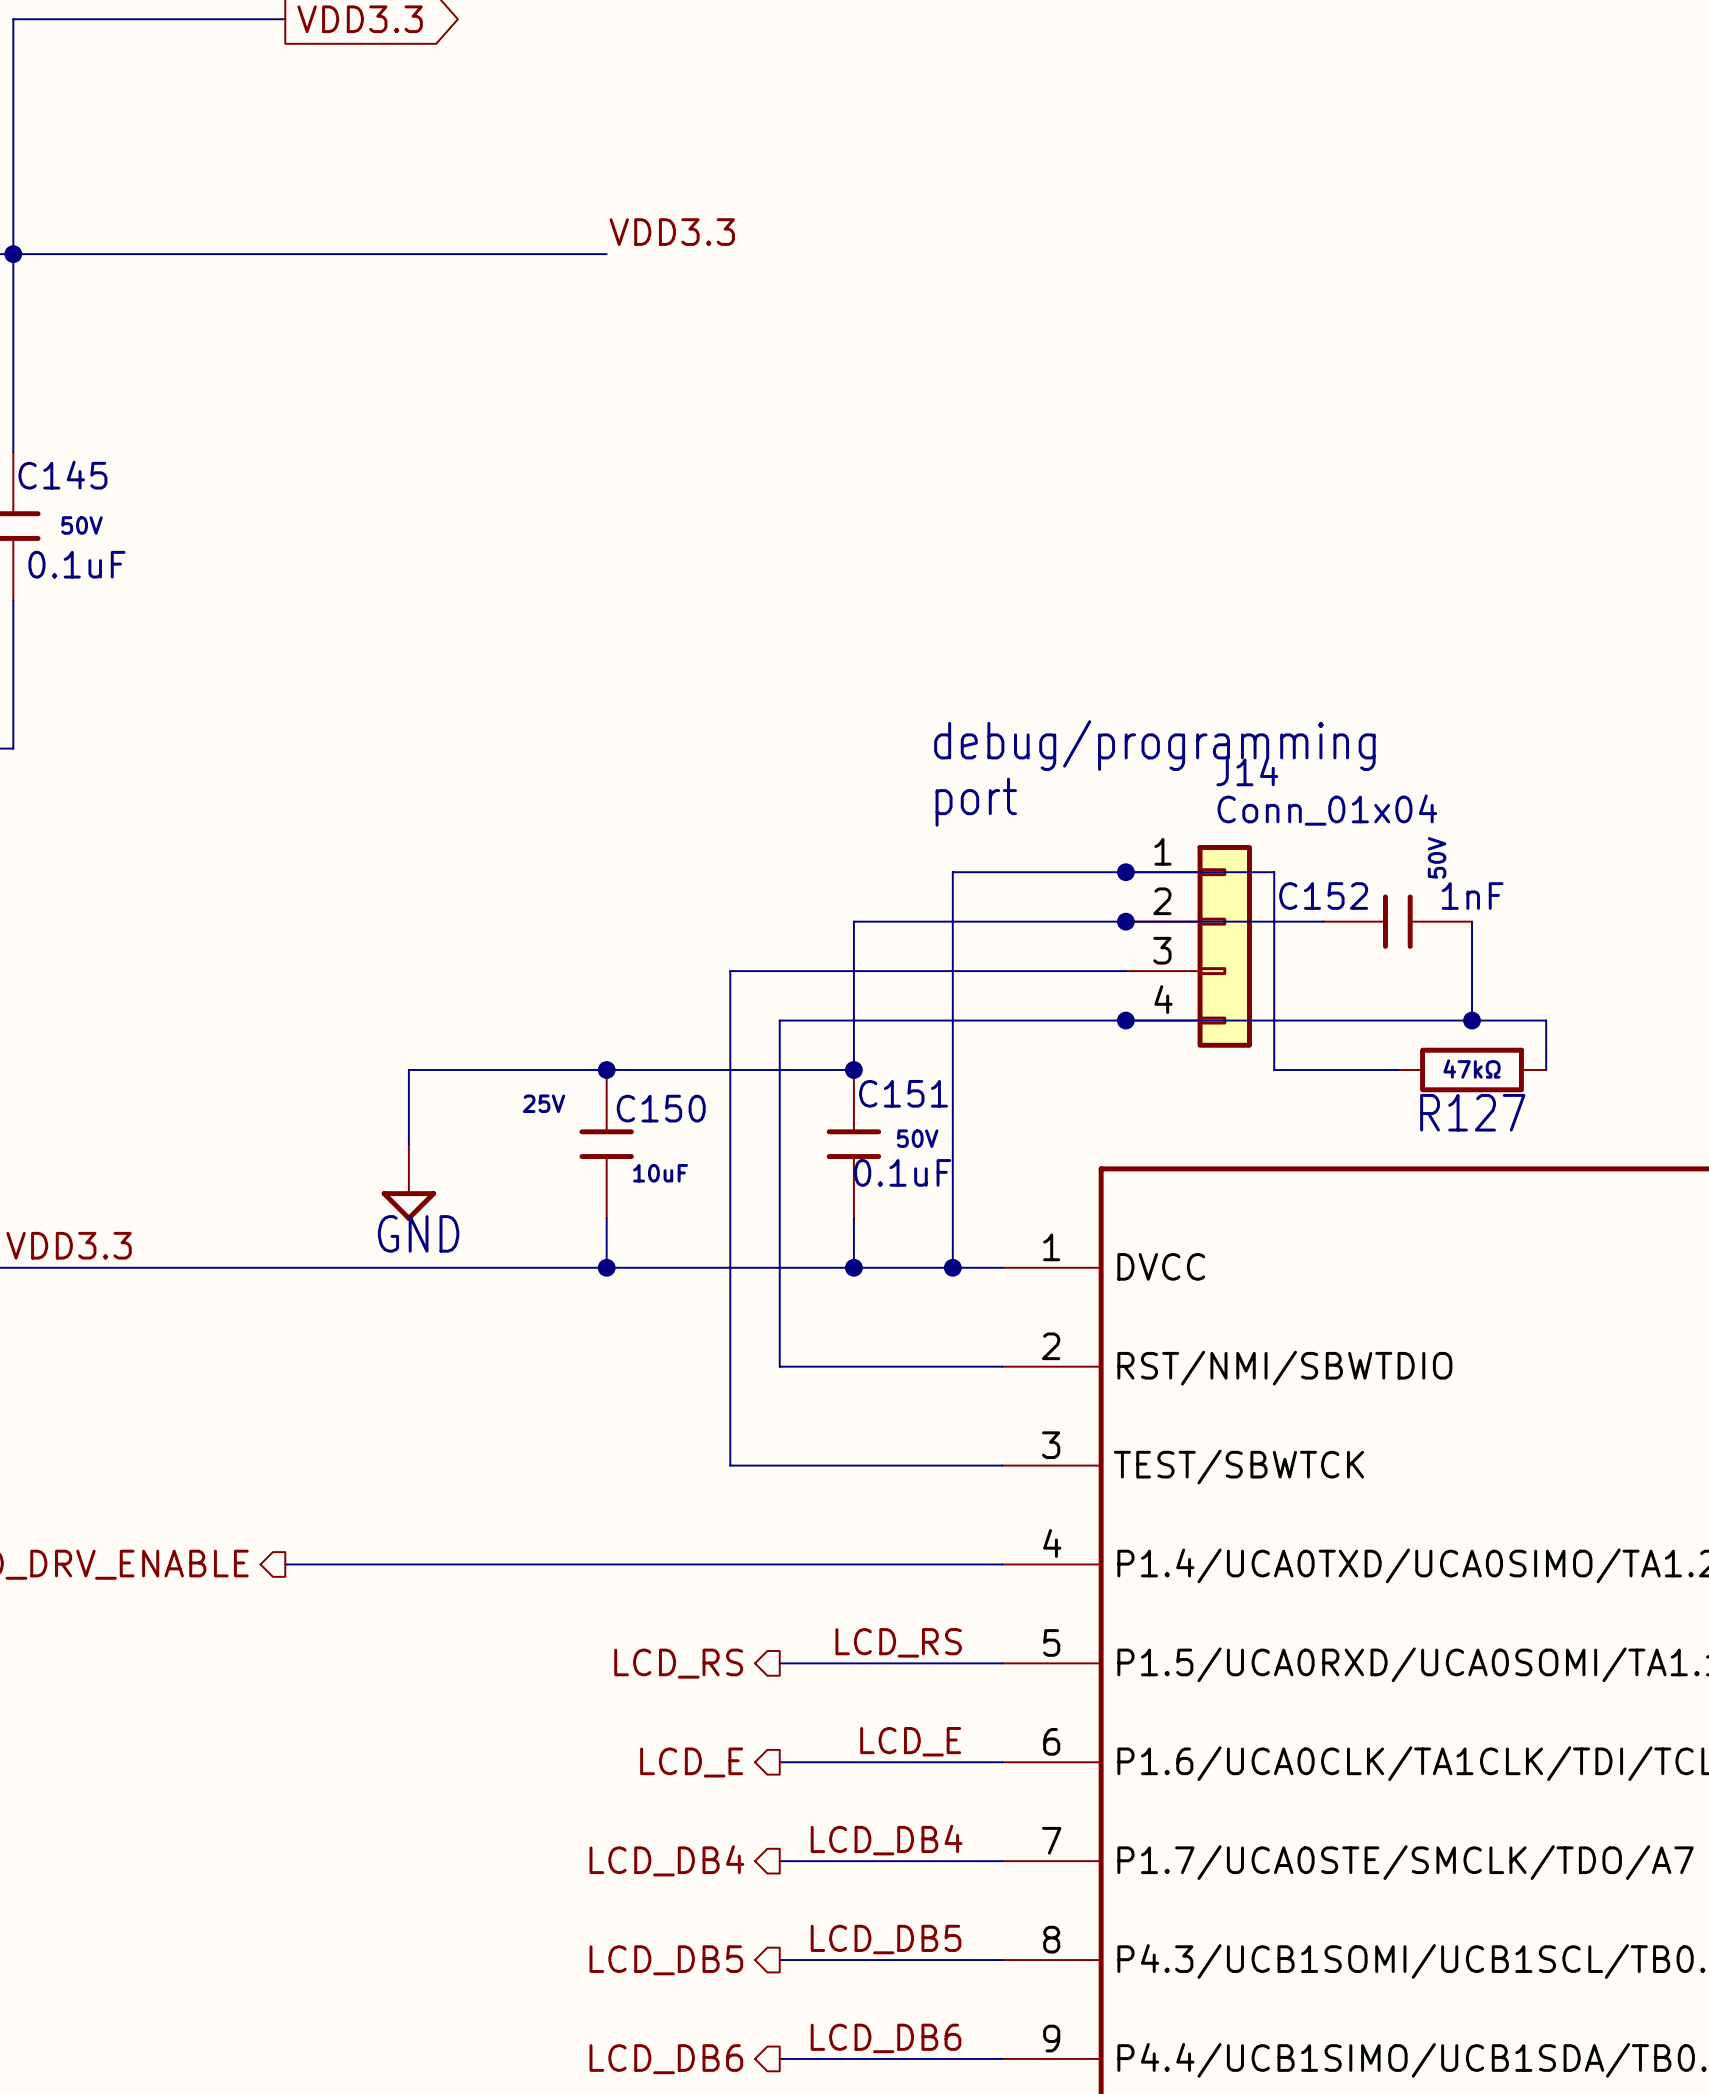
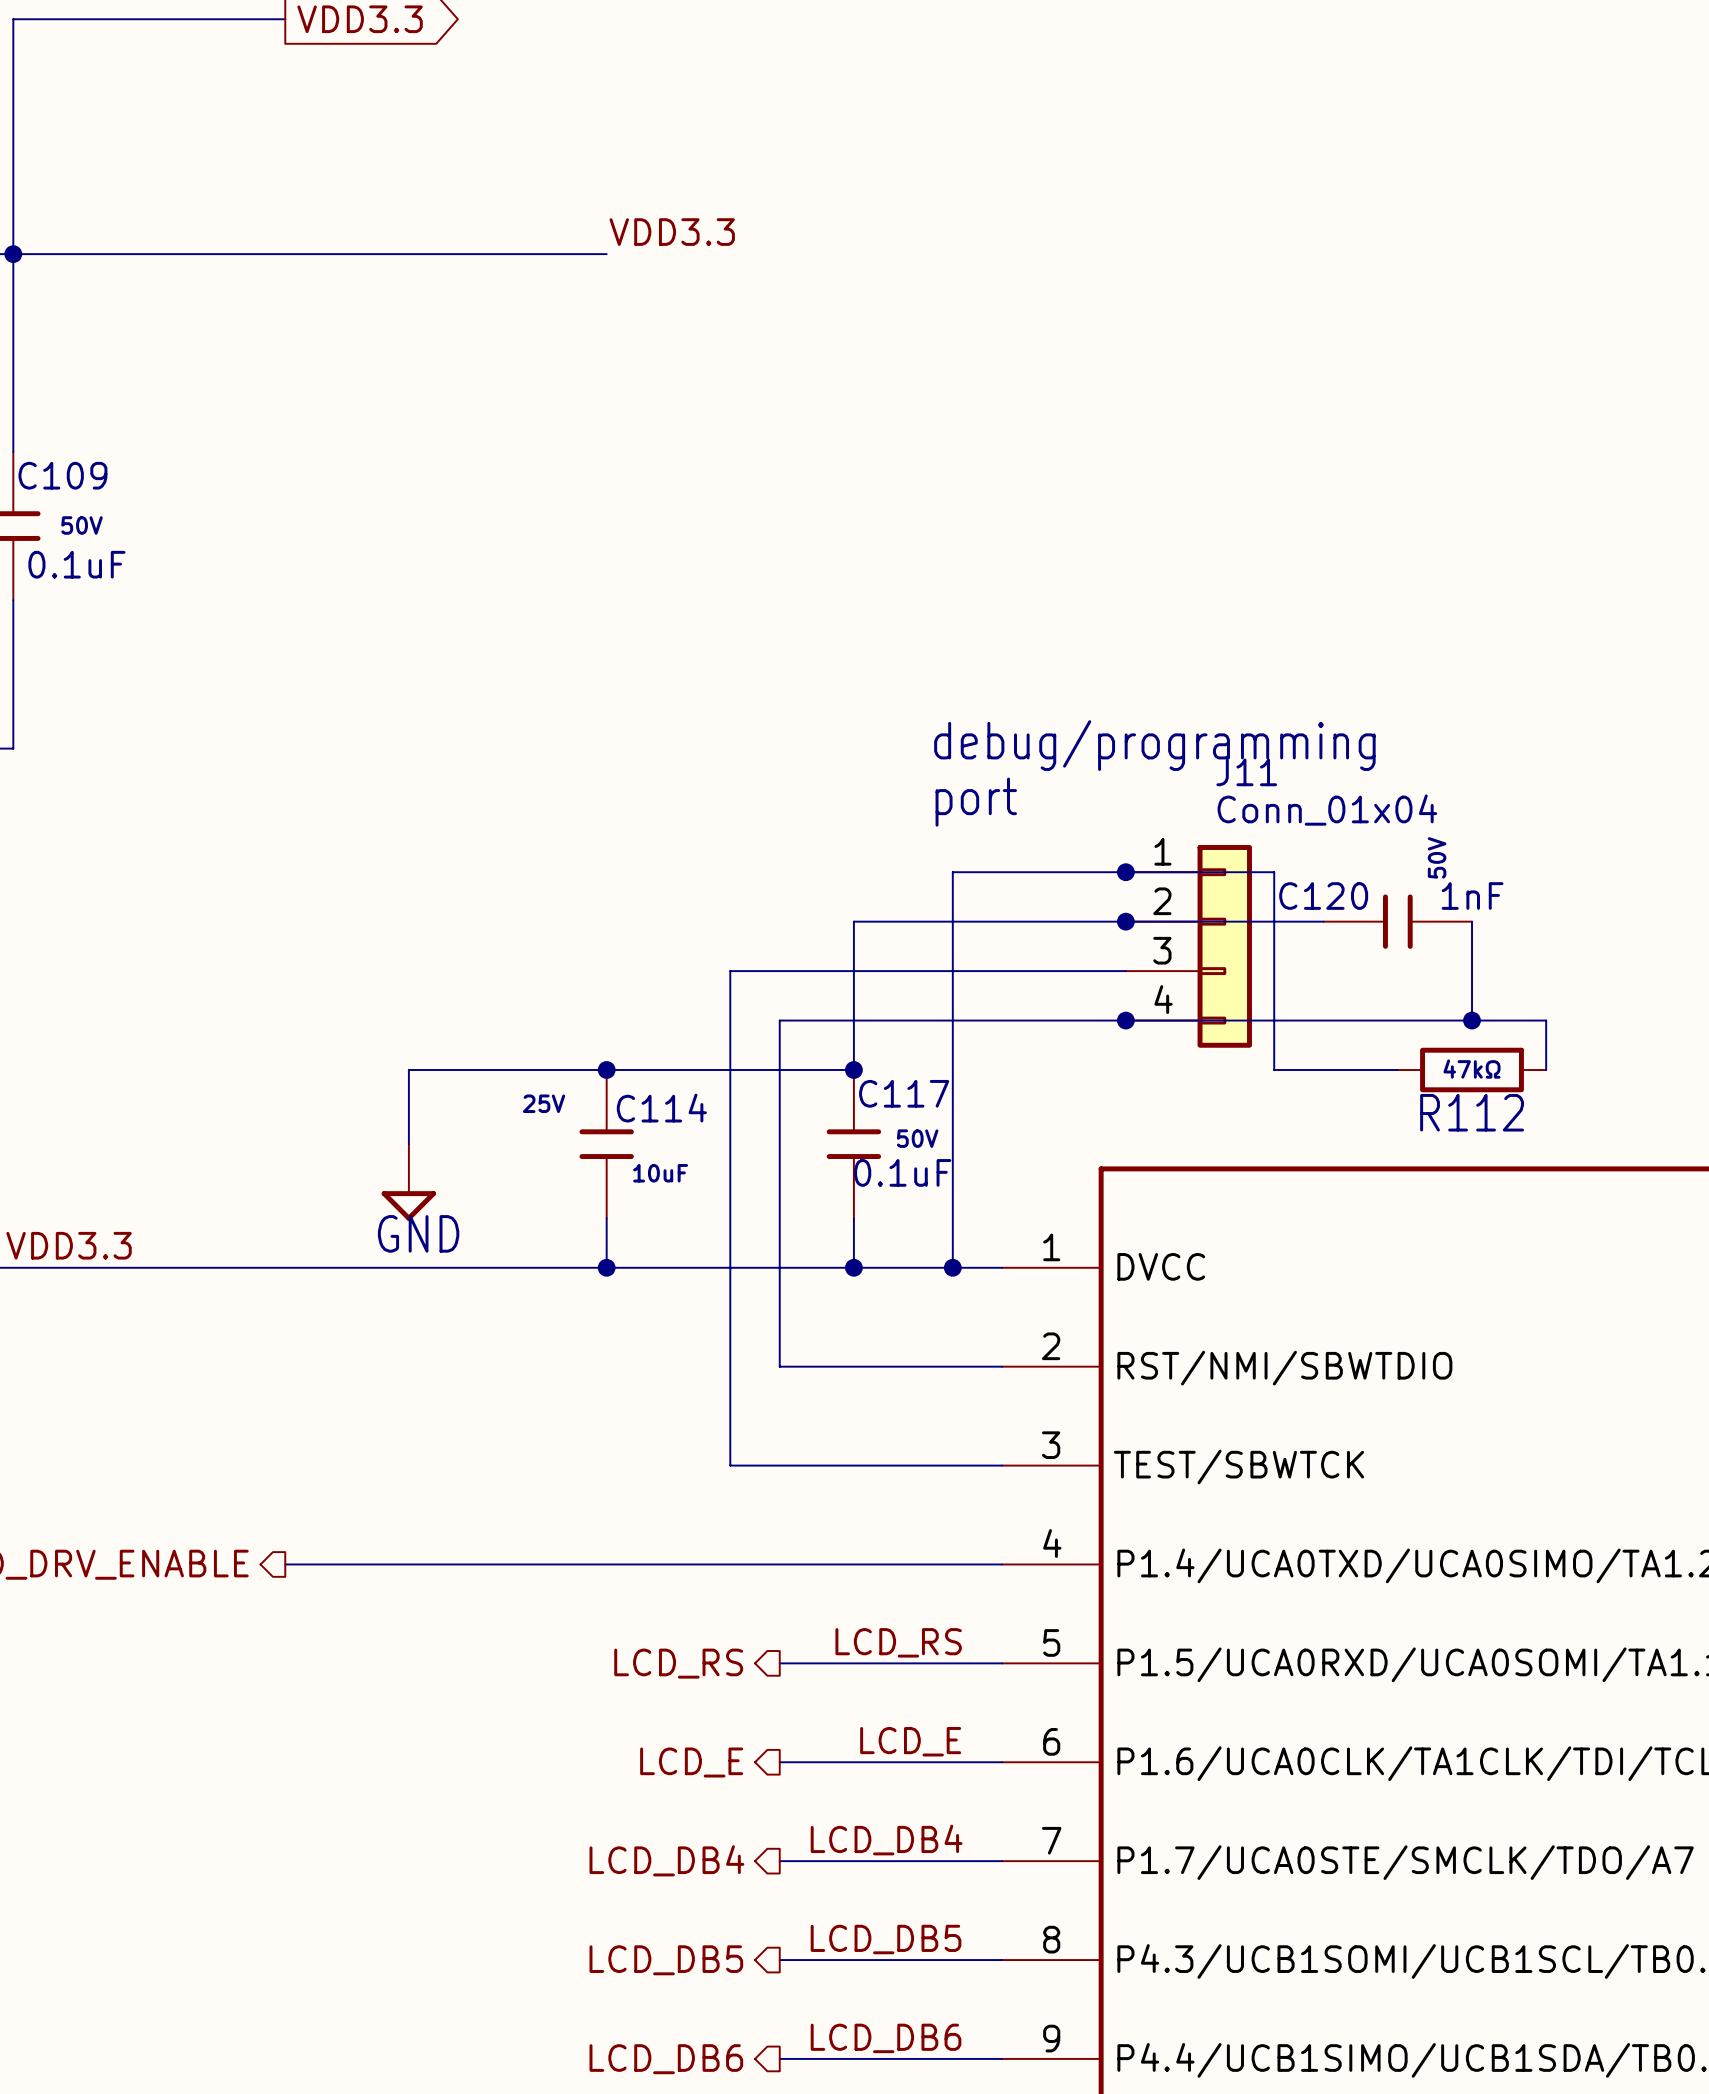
C145 name: C145 (62, 475) -> C109 (62, 475)
J14 name: J14 (1247, 771) -> J11 (1246, 772)
C152 name: C152 (1323, 896) -> C120 (1323, 896)
C151 name: C151 (903, 1093) -> C117 (904, 1093)
C150 name: C150 (661, 1108) -> C114 (661, 1108)
R127 name: R127 (1472, 1112) -> R112 (1472, 1112)

